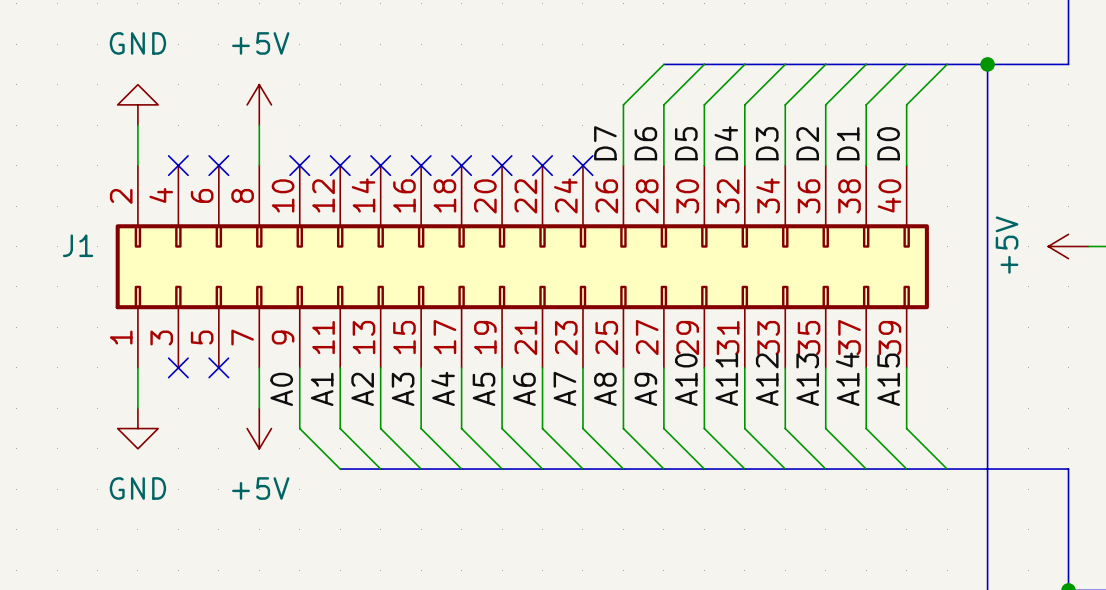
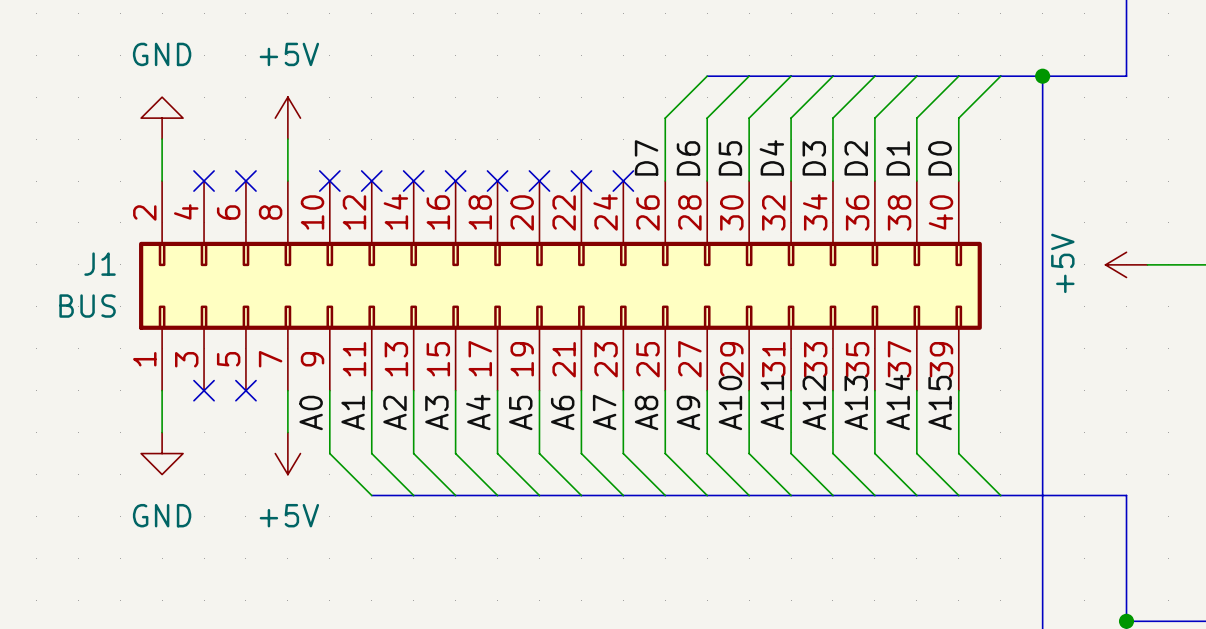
J1 value: none -> BUS (87, 306)

